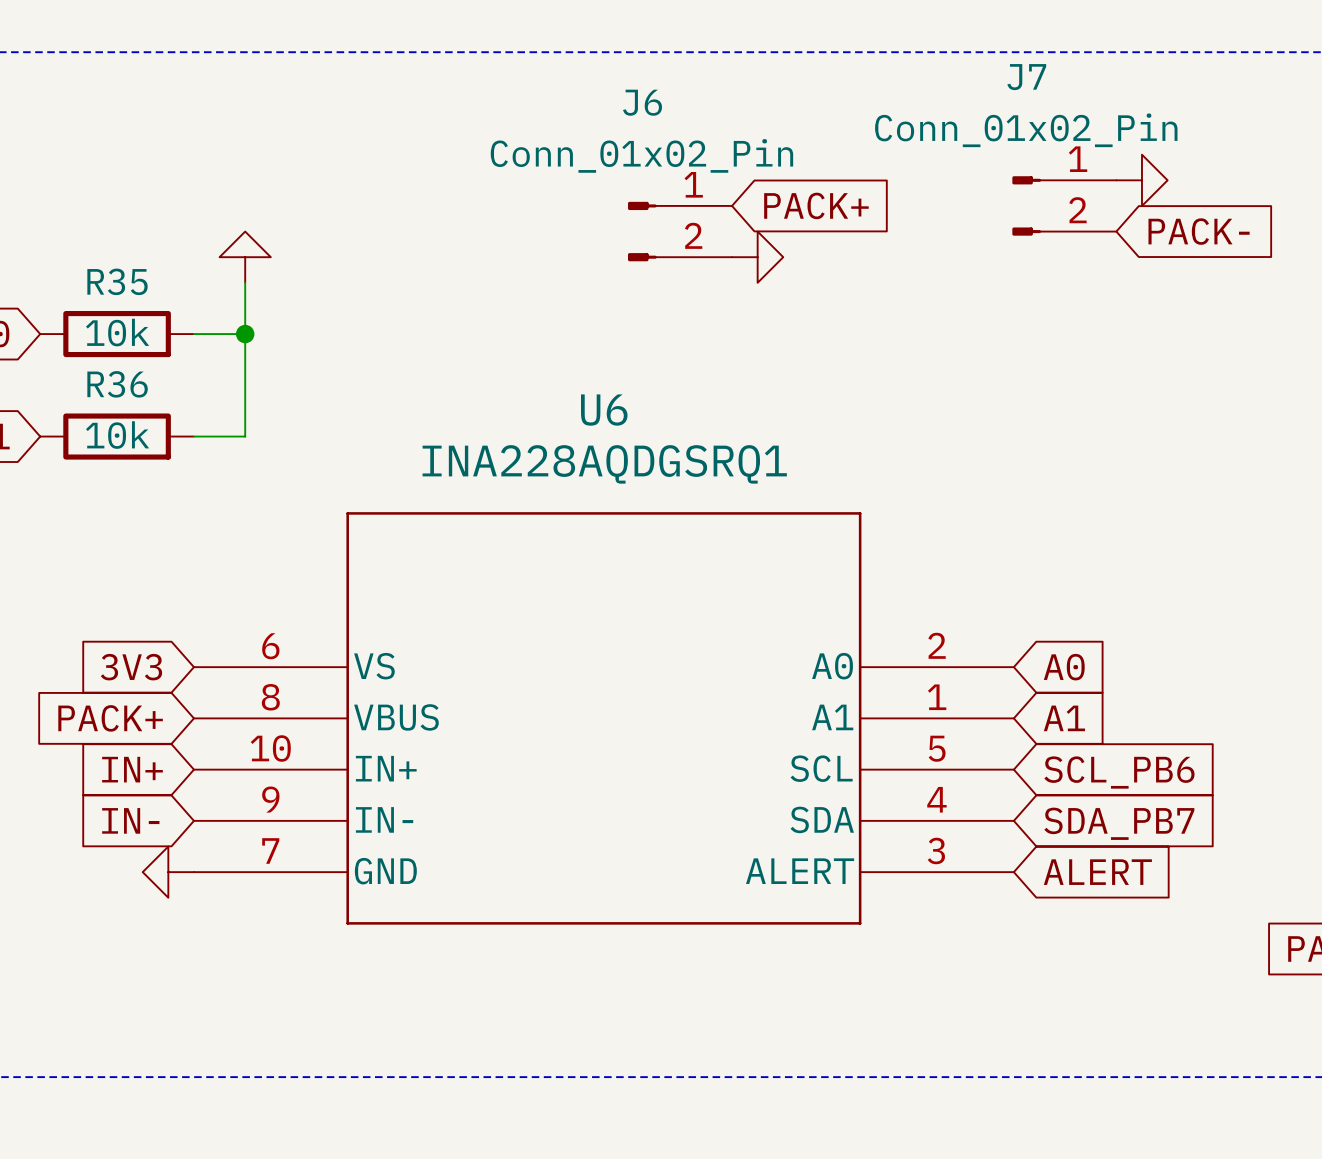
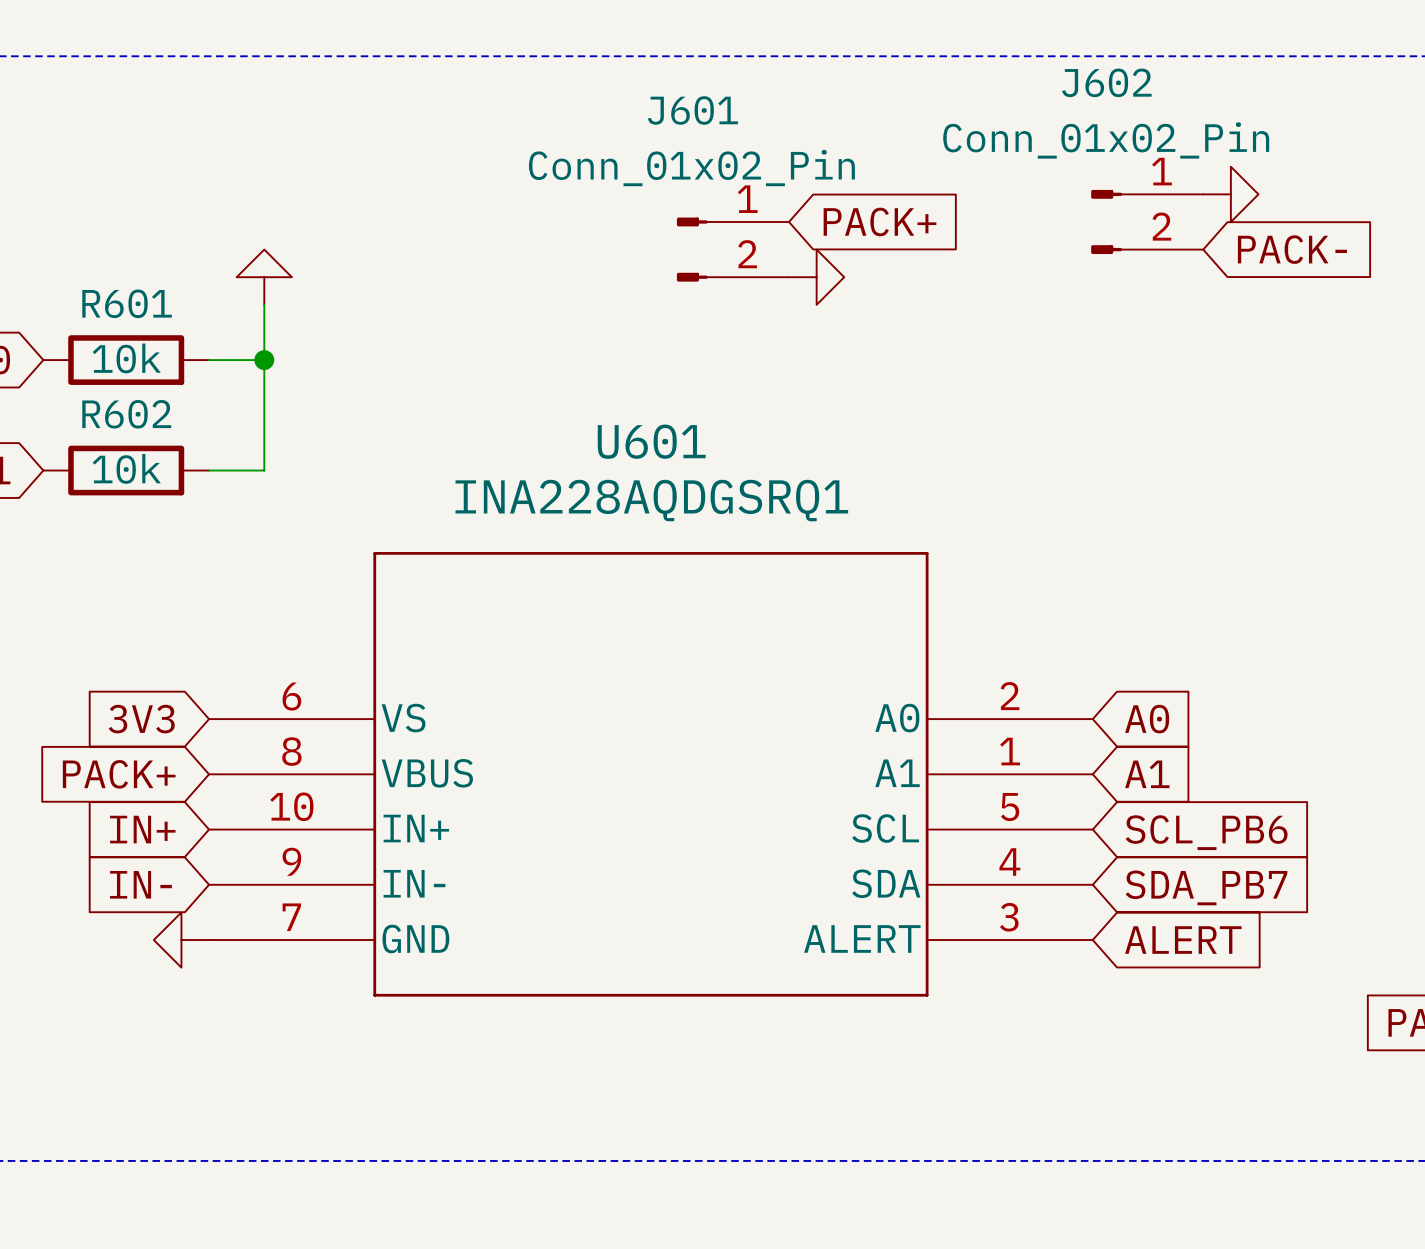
J7 name: J7 (1026, 77) -> J602 (1106, 82)
J6 name: J6 (642, 102) -> J601 (692, 110)
R35 name: R35 (117, 281) -> R601 (127, 303)
R36 name: R36 (117, 384) -> R602 (126, 414)
U6 name: U6 (604, 410) -> U601 (651, 441)

